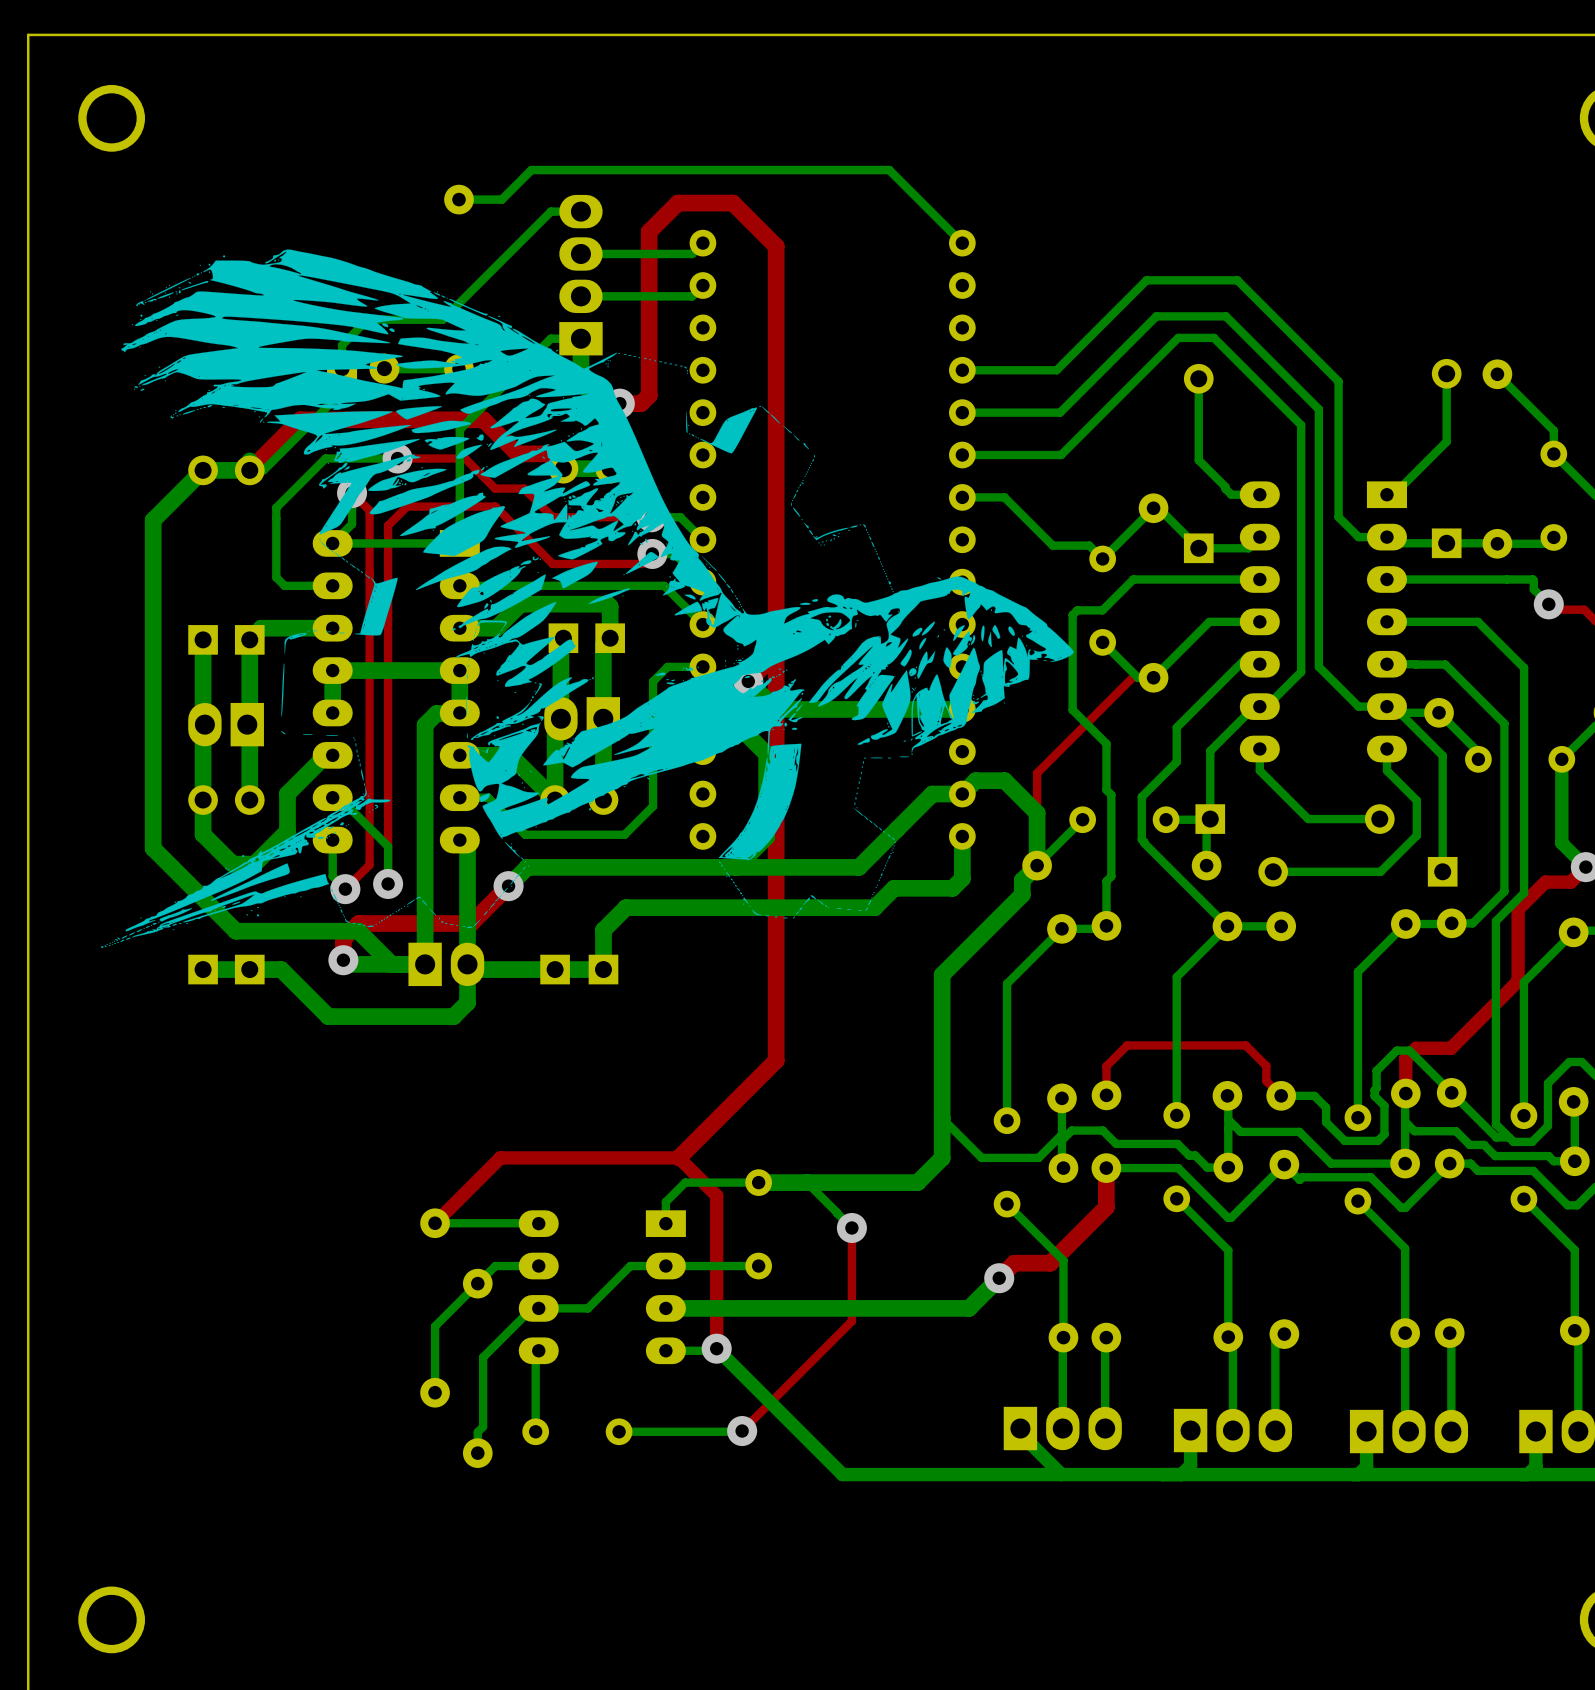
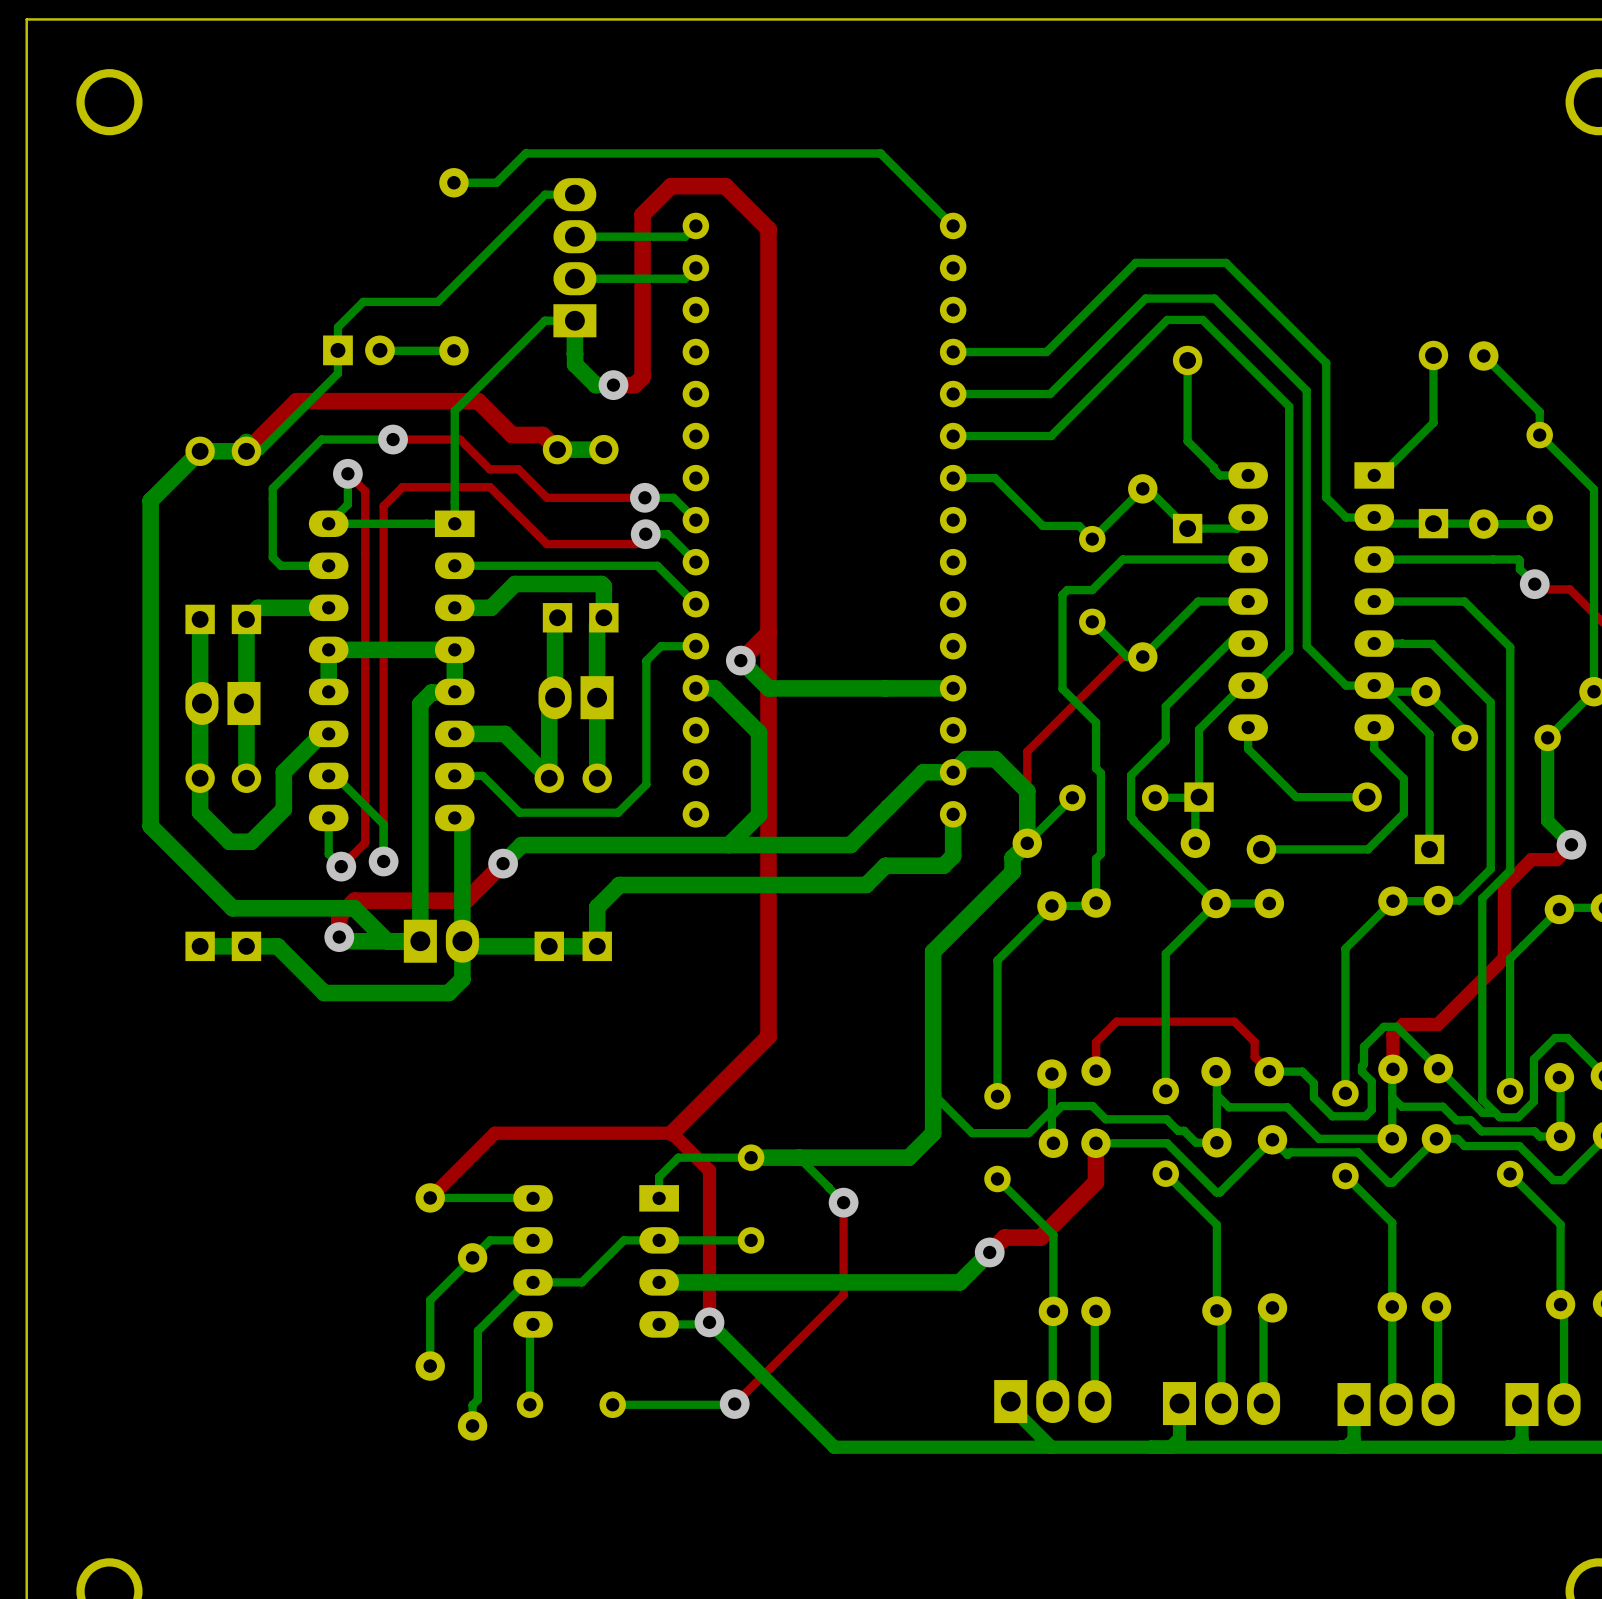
drawing: [100, 249, 1074, 948] -> none

